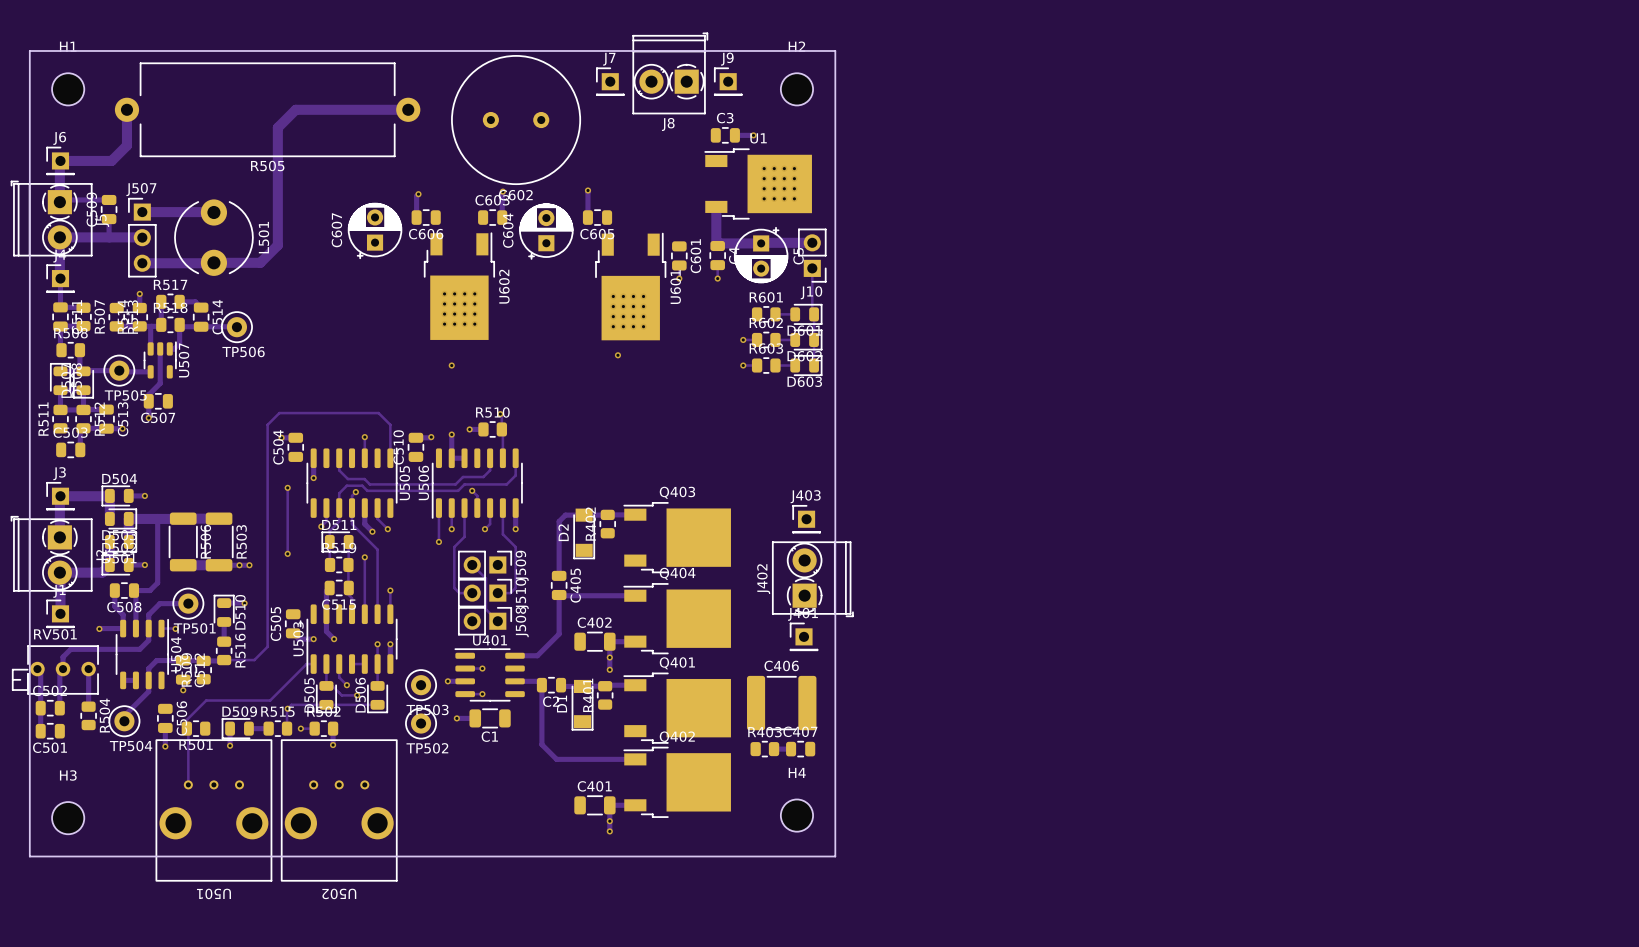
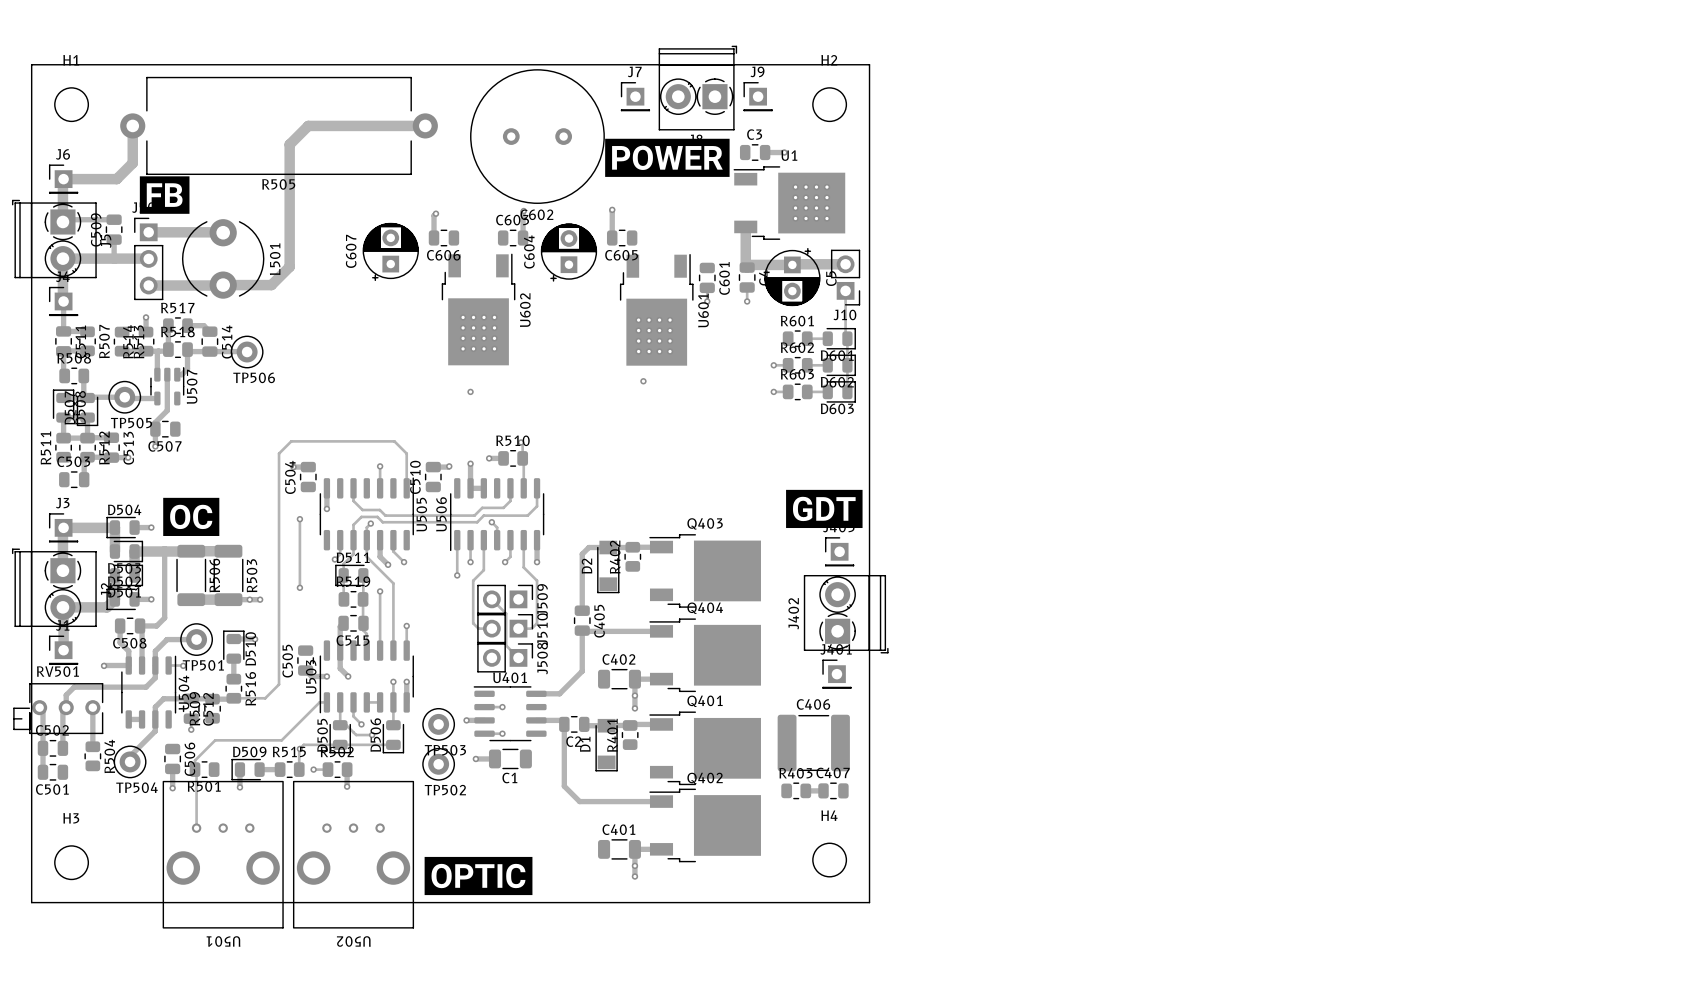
drawing: none -> [605, 138, 730, 177]
drawing: none -> [139, 176, 190, 214]
drawing: none -> [786, 489, 863, 529]
drawing: none -> [163, 497, 220, 536]
drawing: none -> [424, 856, 533, 896]

